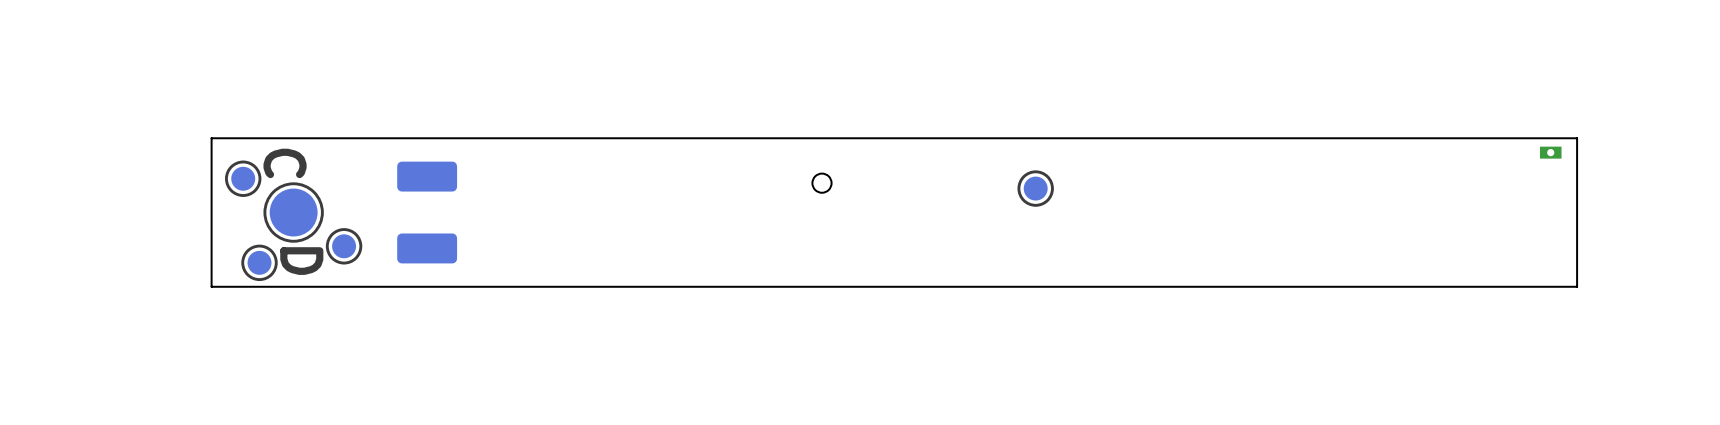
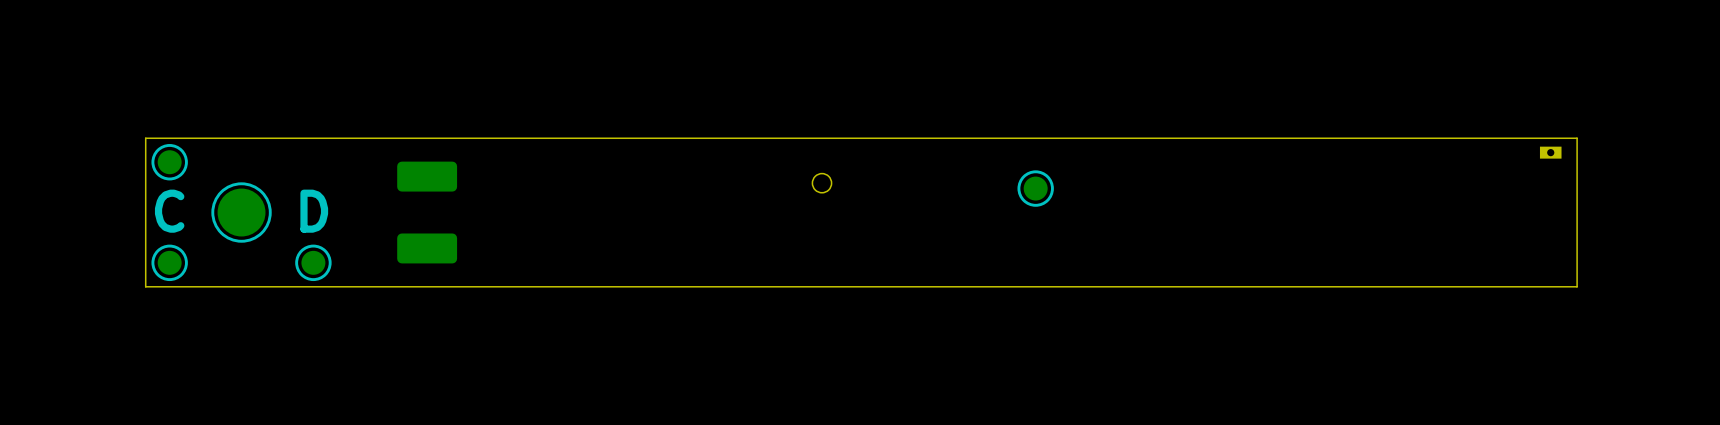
board edge: (211, 138) (211, 286) -> (211, 138) (145, 138) (145, 286) (211, 286)
part: none -> (169, 162)
text rotation: 0° (285, 163) -> 90° counterclockwise (169, 211)
text position: C (285, 163) -> C (169, 211)
part: (243, 178) -> none
part position: (293, 212) -> (241, 212)
part: (344, 246) -> none
text rotation: 0° (301, 261) -> 90° counterclockwise (314, 211)
part: none -> (169, 262)
part: (259, 262) -> none
part: none -> (313, 262)

